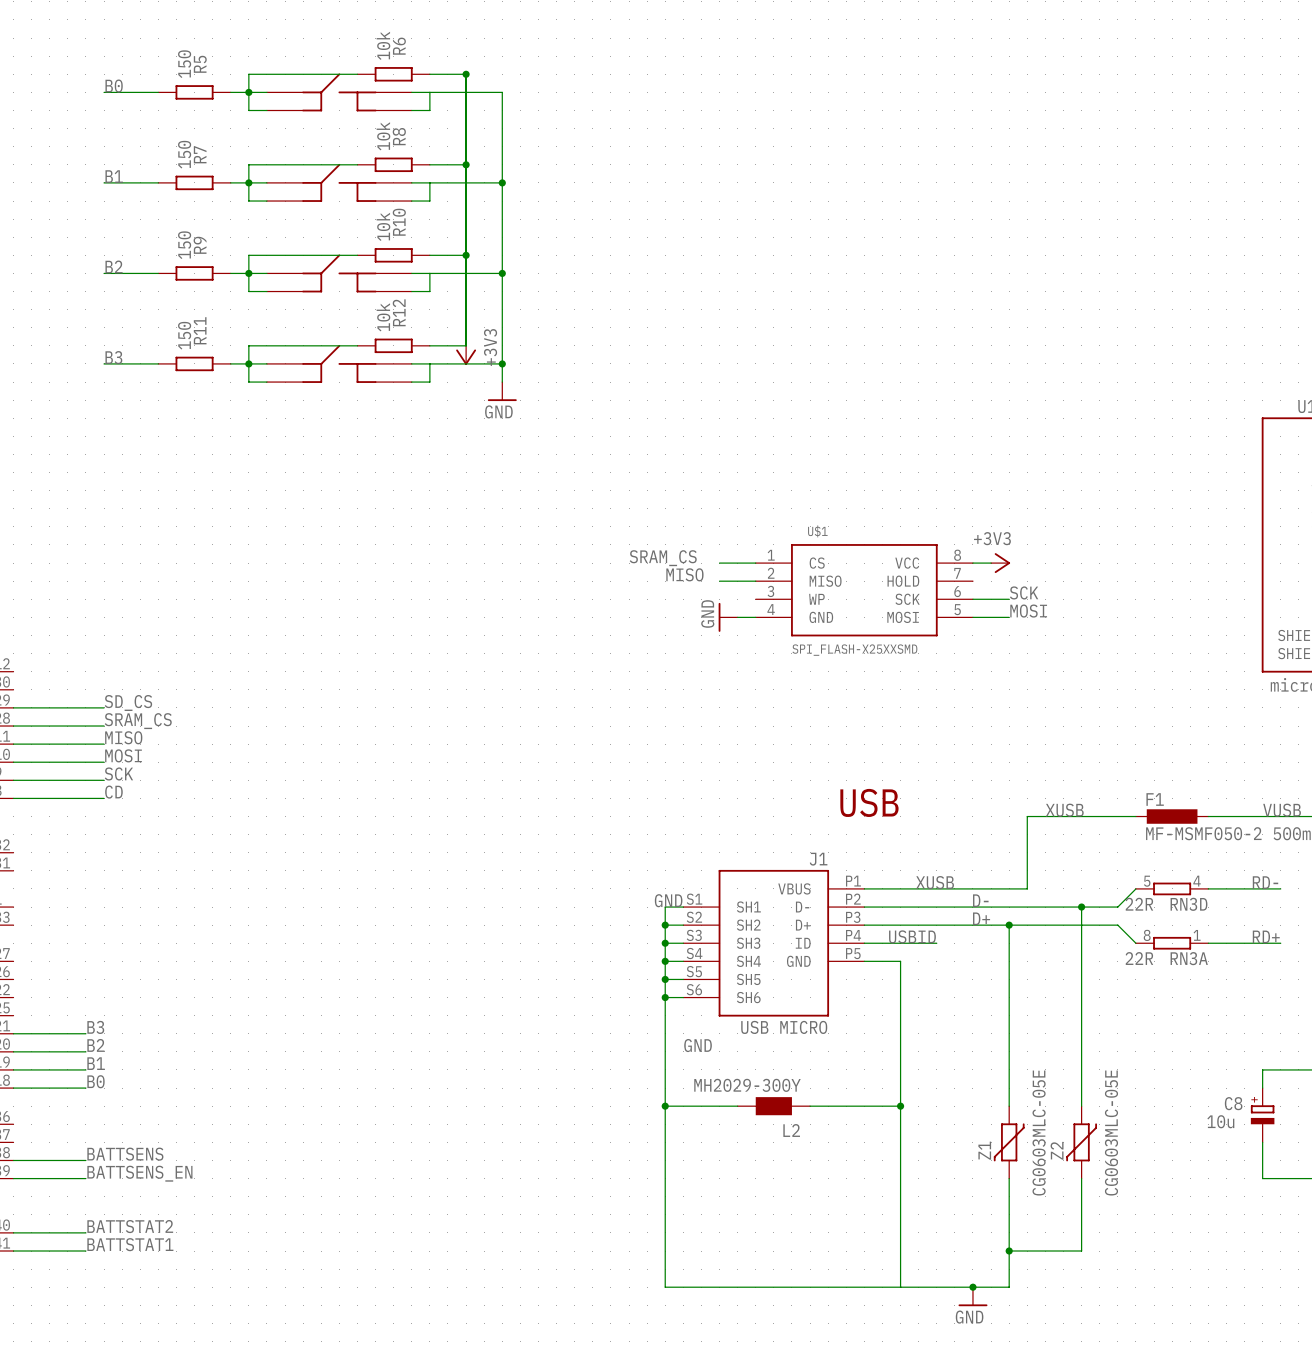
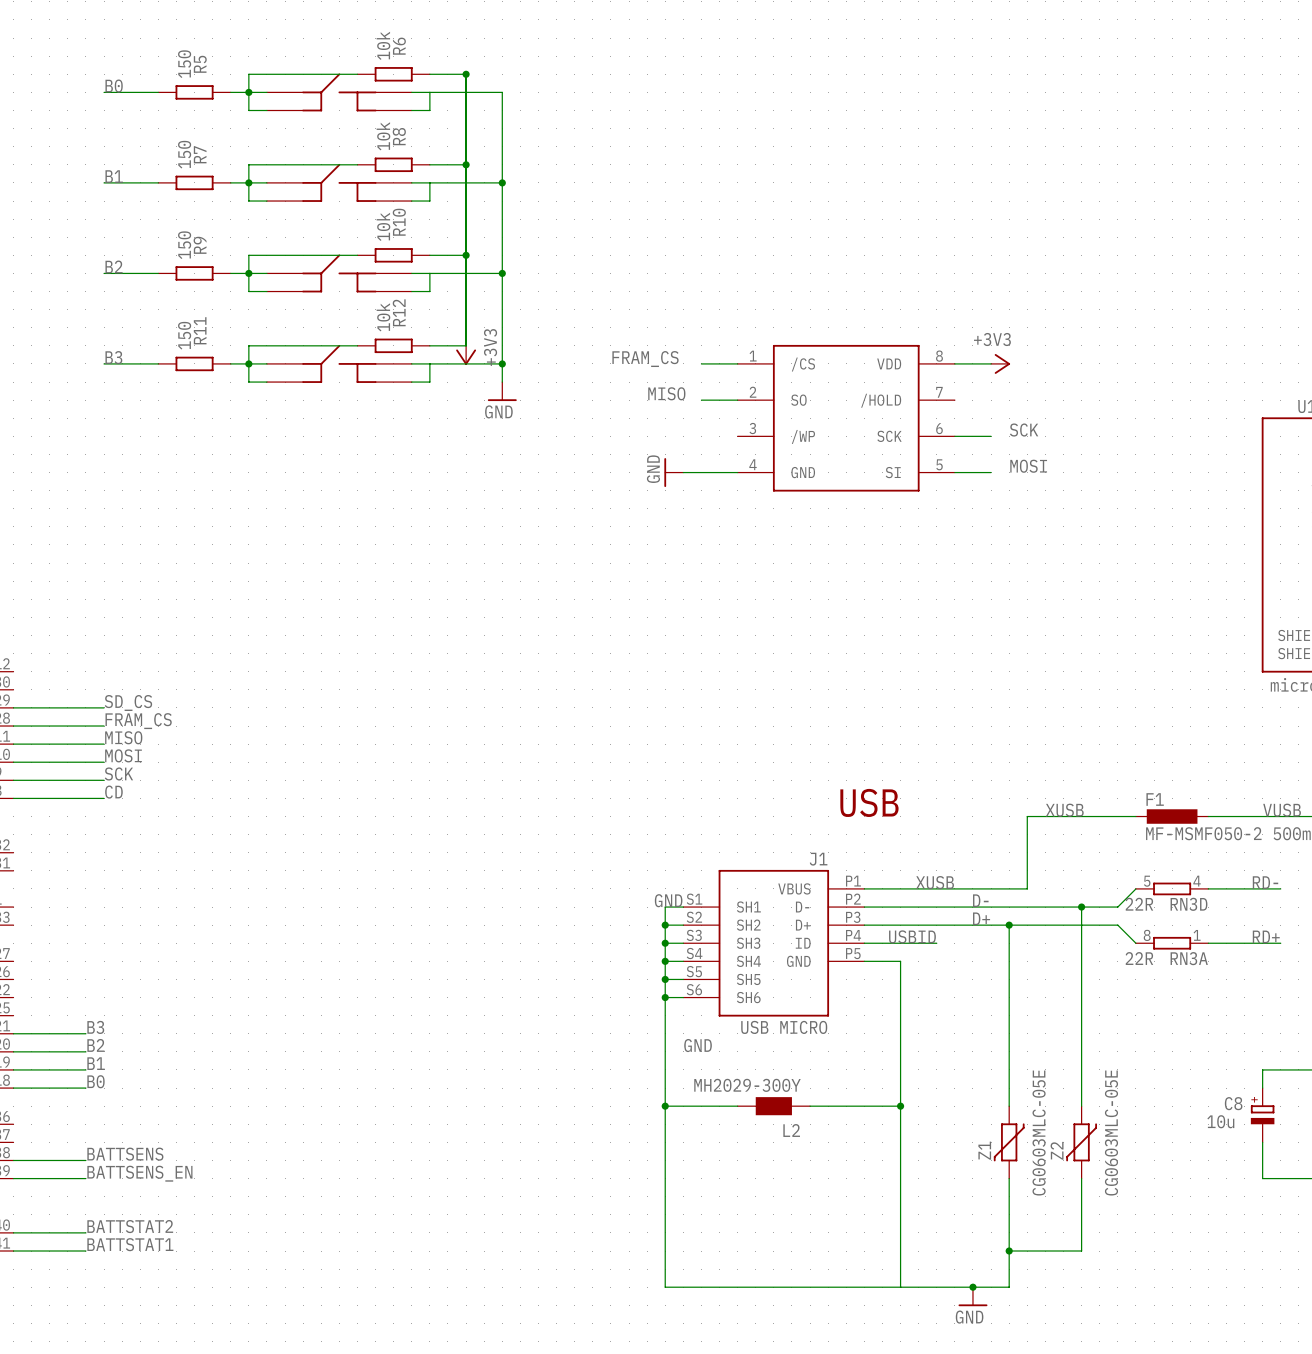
label: none -> FRAM_CS (645, 359)
wire: none -> (701, 363) (737, 363)
wire: none -> (954, 363) (991, 363)
power symbol: none -> +3V3 (1000, 363)
label: none -> MISO (666, 393)
part: none -> (846, 418)
wire: none -> (683, 472) (737, 472)
label: SRAM_CS (663, 558) -> none
wire: (719, 563) (755, 563) -> (701, 400) (737, 400)
wire: (972, 563) (991, 563) -> none
power symbol: +3V3 (1000, 563) -> none
label: MISO (684, 574) -> none
wire: (719, 581) (755, 581) -> none
U$1: SPI_FLASH-X25XXSMD (864, 590) -> none
label position: SCK (1024, 592) -> SCK (1024, 430)
wire: (972, 599) (1009, 599) -> (954, 436) (991, 436)
label position: MOSI (1028, 611) -> MOSI (1028, 466)
power symbol position: GND (728, 617) -> GND (673, 472)
wire: (737, 617) (755, 617) -> none
wire: (972, 617) (1009, 617) -> (954, 472) (991, 472)
label: SRAM_CS (138, 721) -> FRAM_CS (138, 721)

